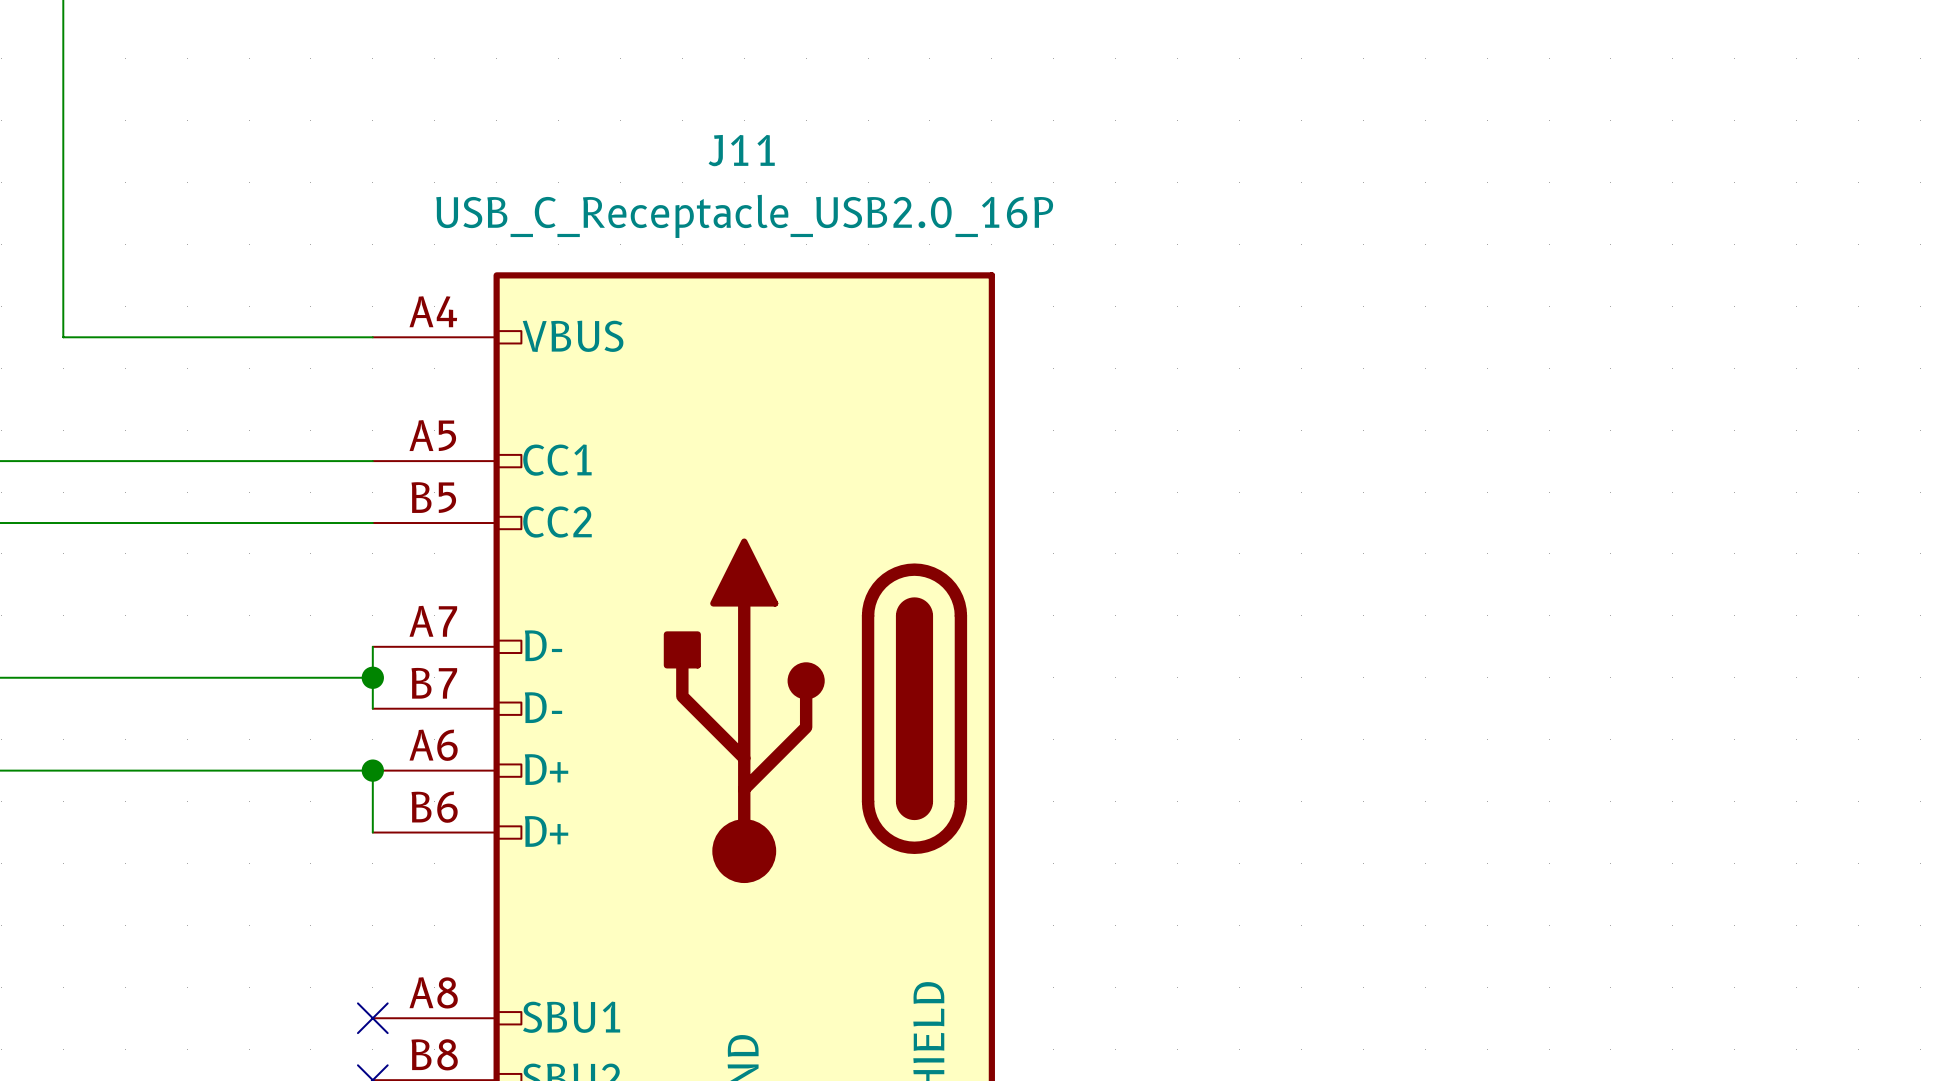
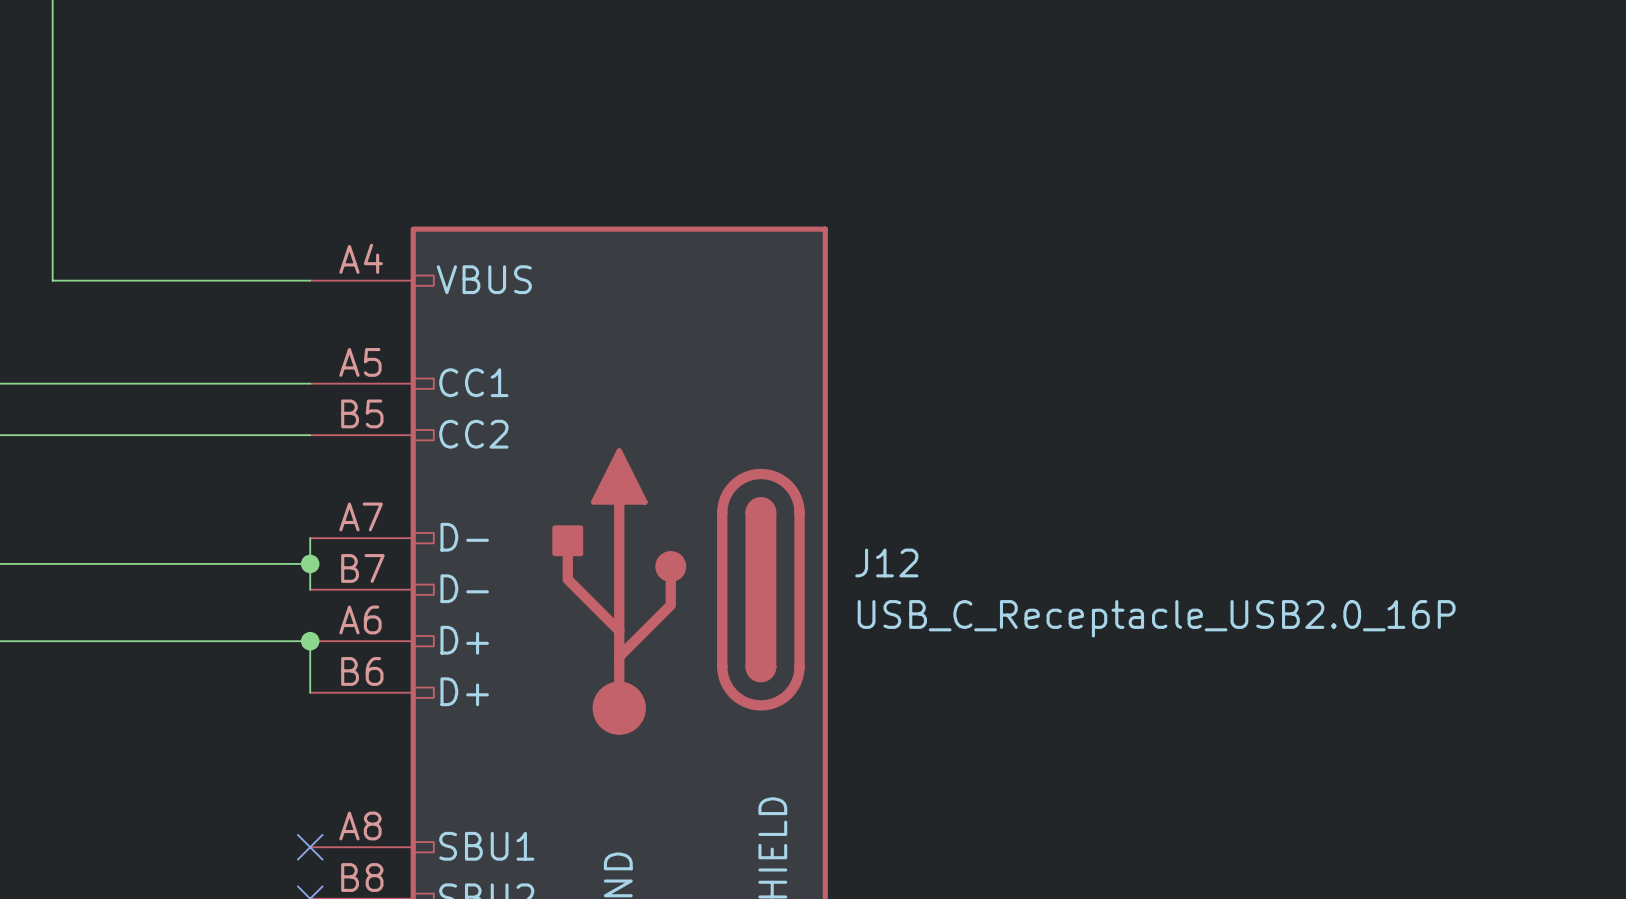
J11 name: J11 (741, 150) -> J12 (886, 562)
J11 value position: USB_C_Receptacle_USB2.0_16P (744, 216) -> USB_C_Receptacle_USB2.0_16P (1156, 618)

